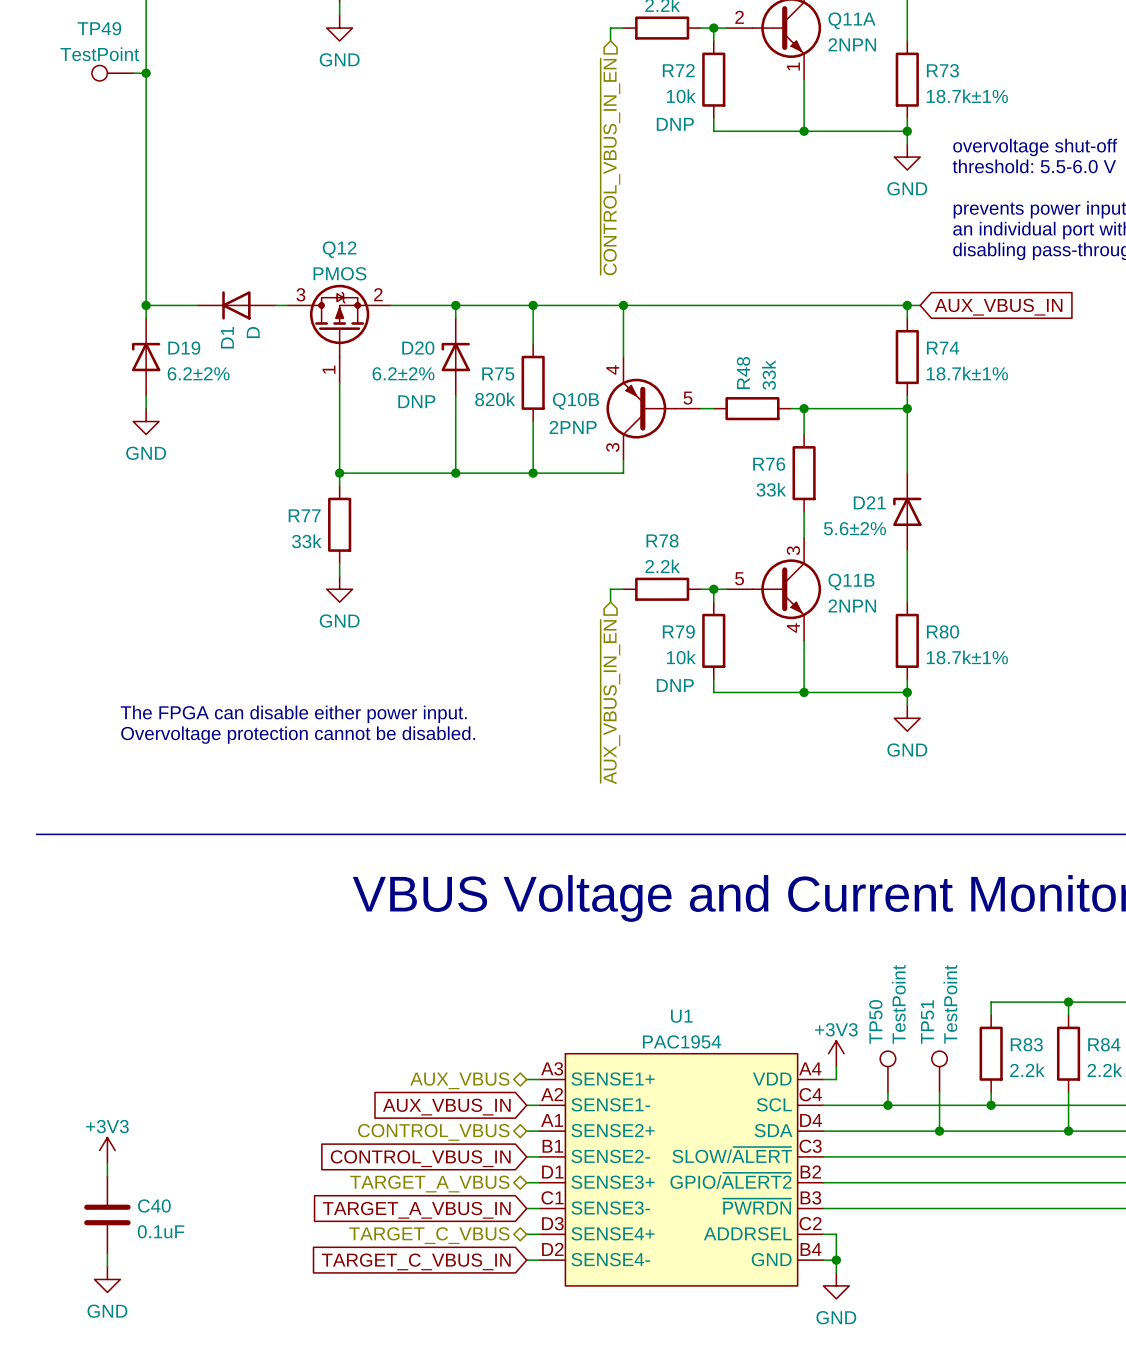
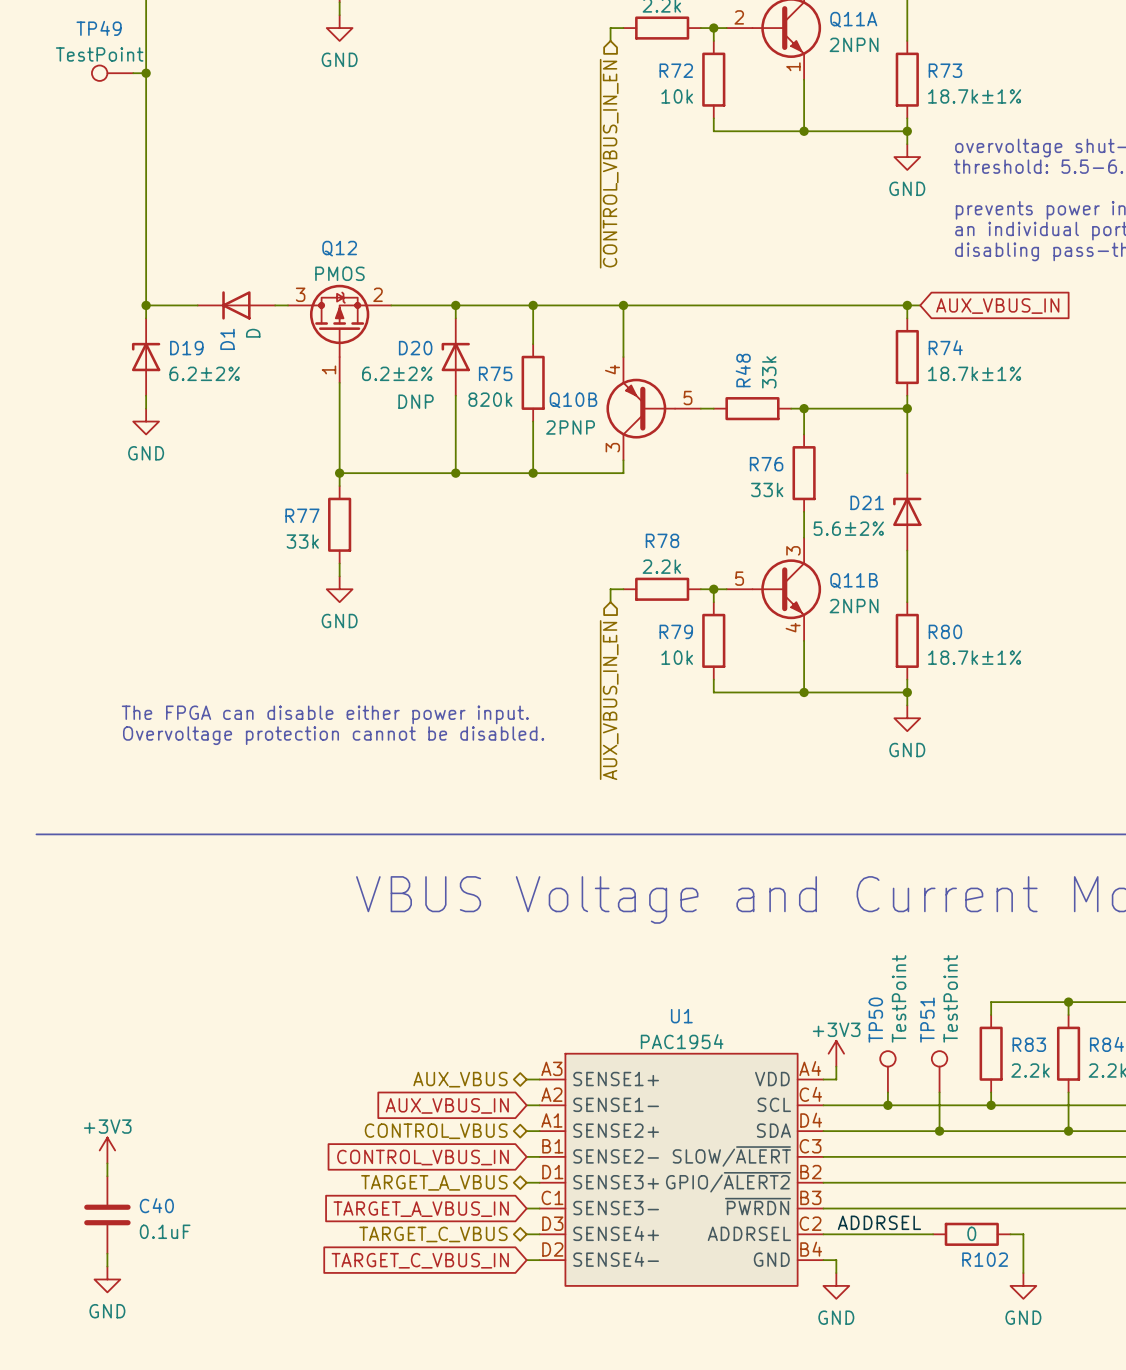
R72 text: DNP (675, 124) -> none
R79 text: DNP (675, 685) -> none
label: none -> ADDRSEL (879, 1222)
wire: (836, 1234) (836, 1260) -> (836, 1234) (933, 1234)
R102: none -> 0 (971, 1234)
wire: none -> (1010, 1234) (1023, 1234) (1023, 1273)
junction: (836, 1260) -> none
power symbol: none -> GND (1023, 1285)

